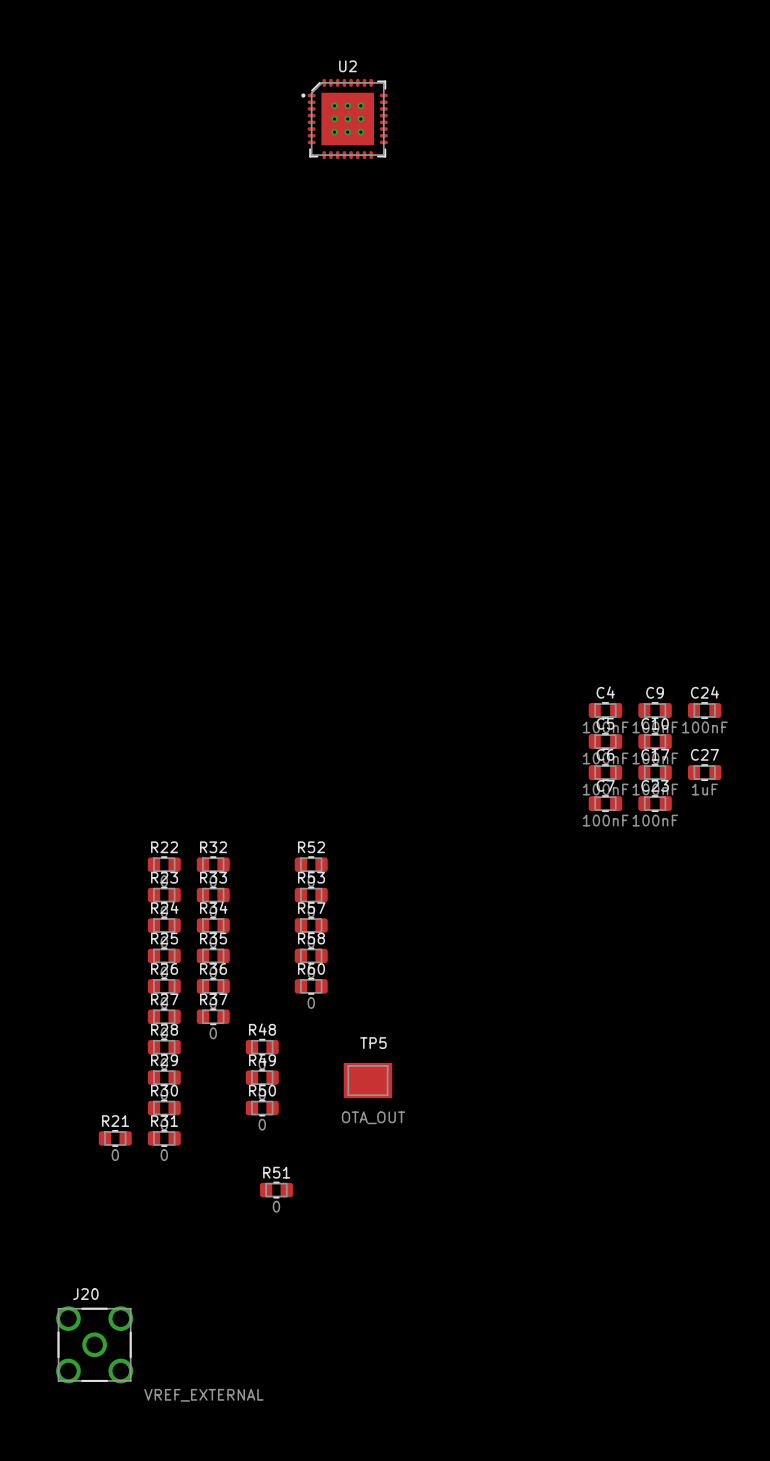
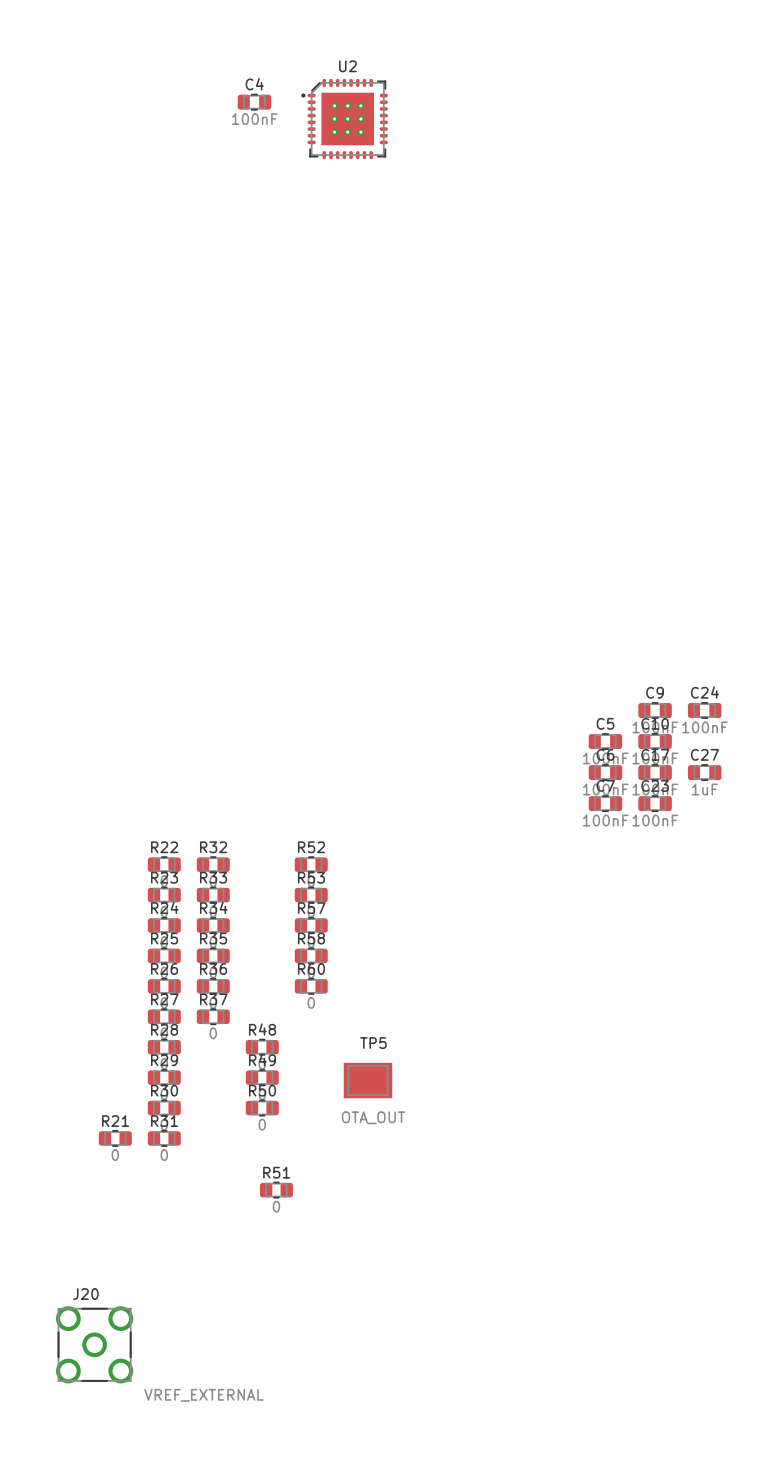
C4 position: (605, 710) -> (254, 102)

